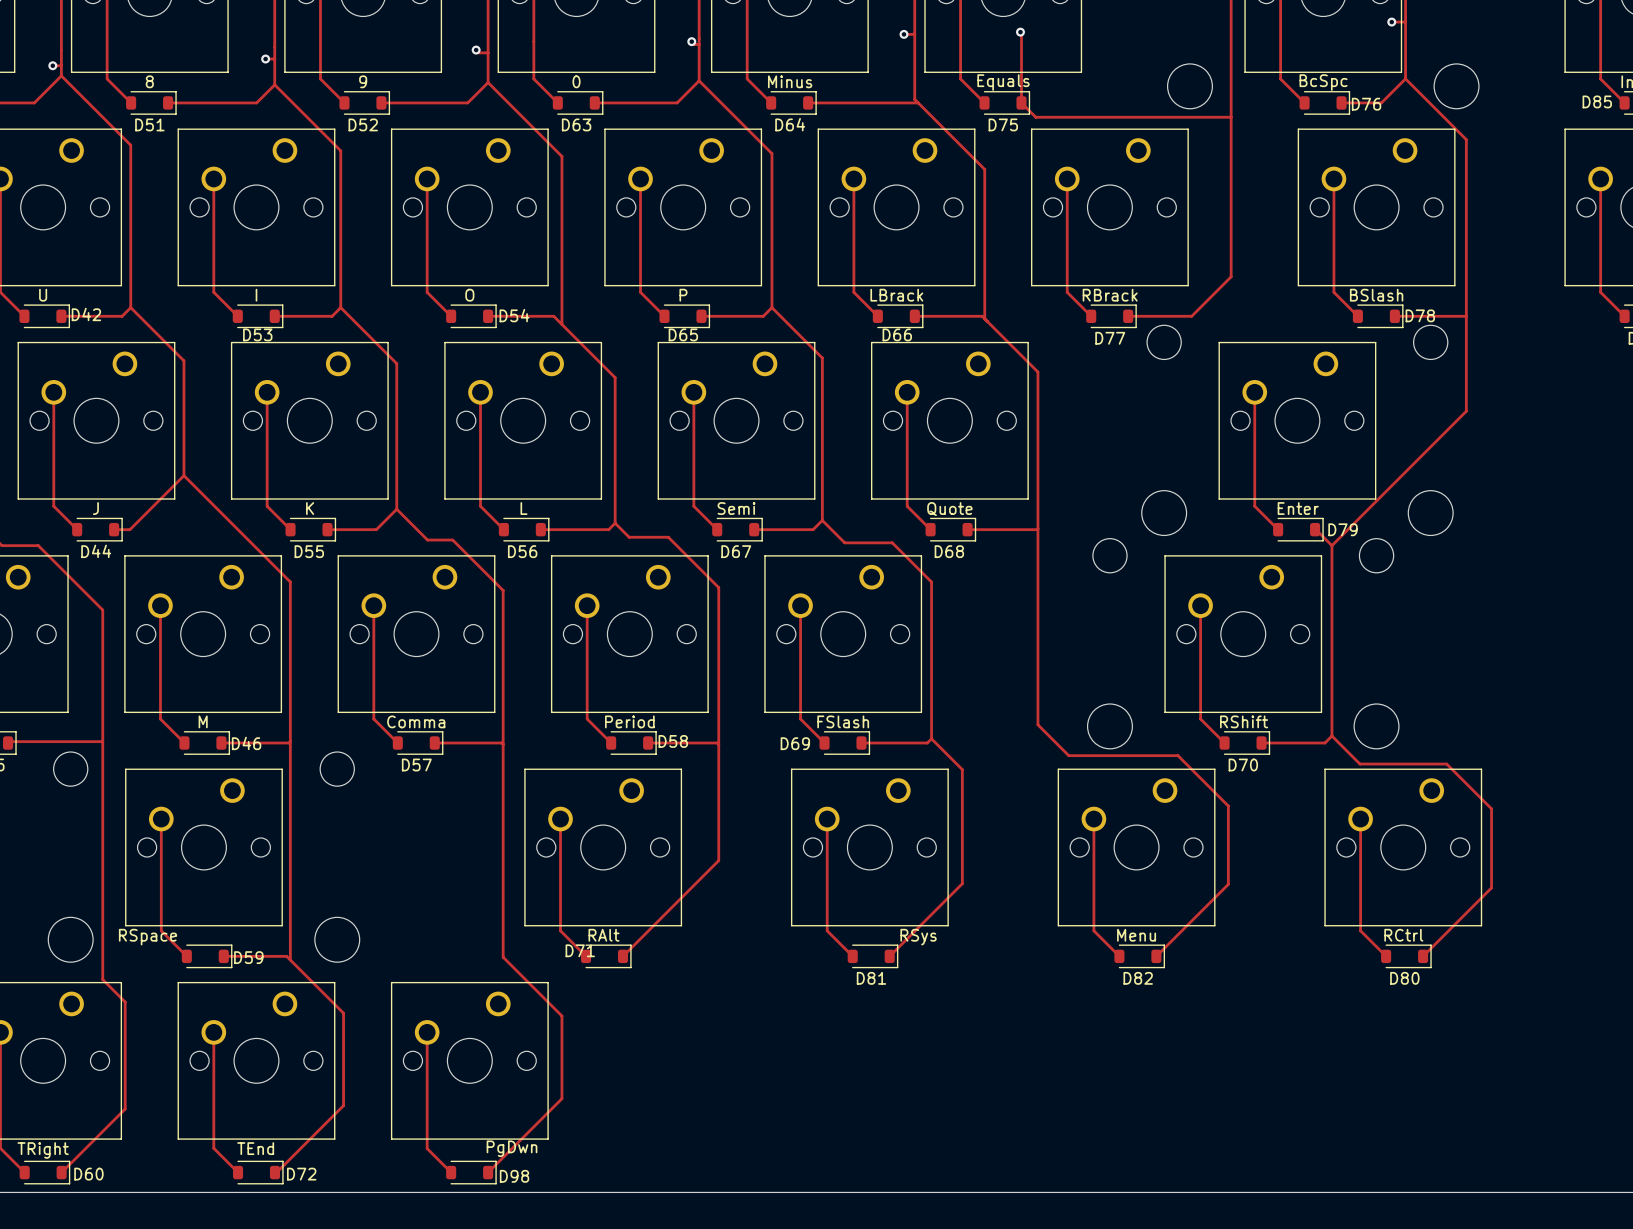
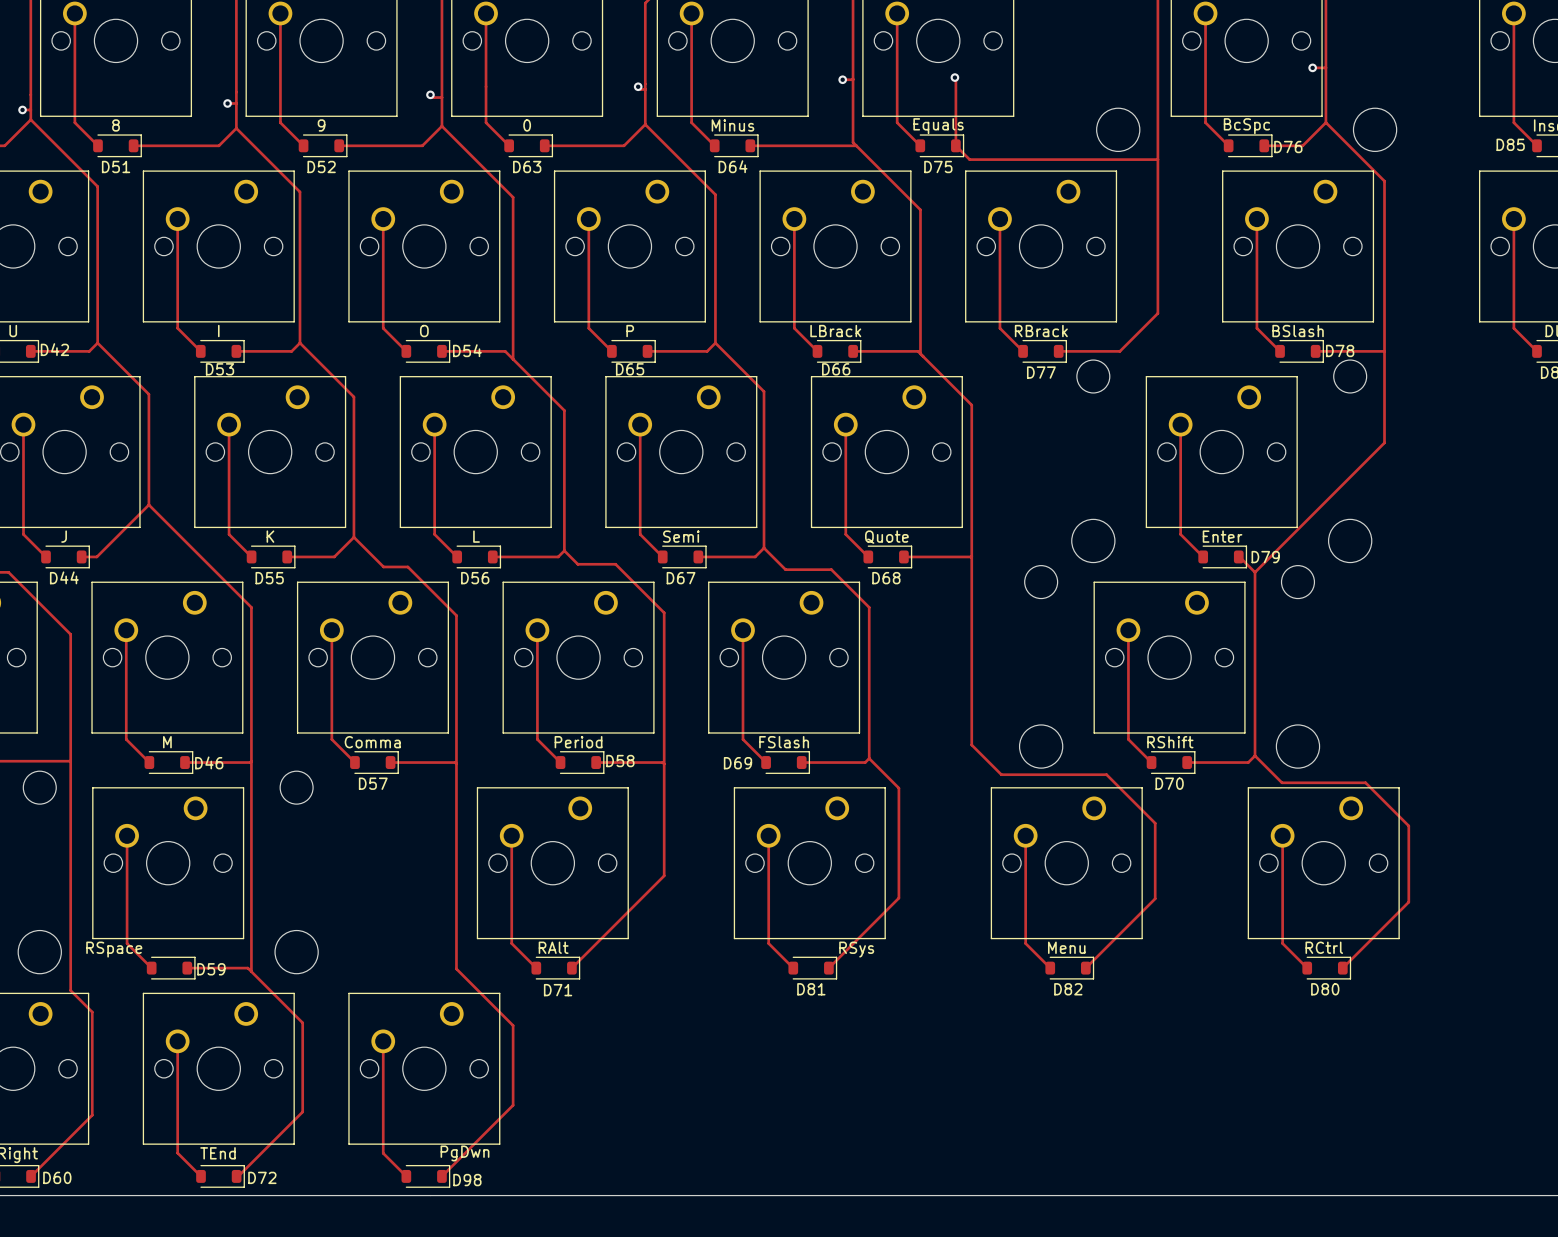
D71 name position: D71 (580, 950) -> D71 (558, 990)

